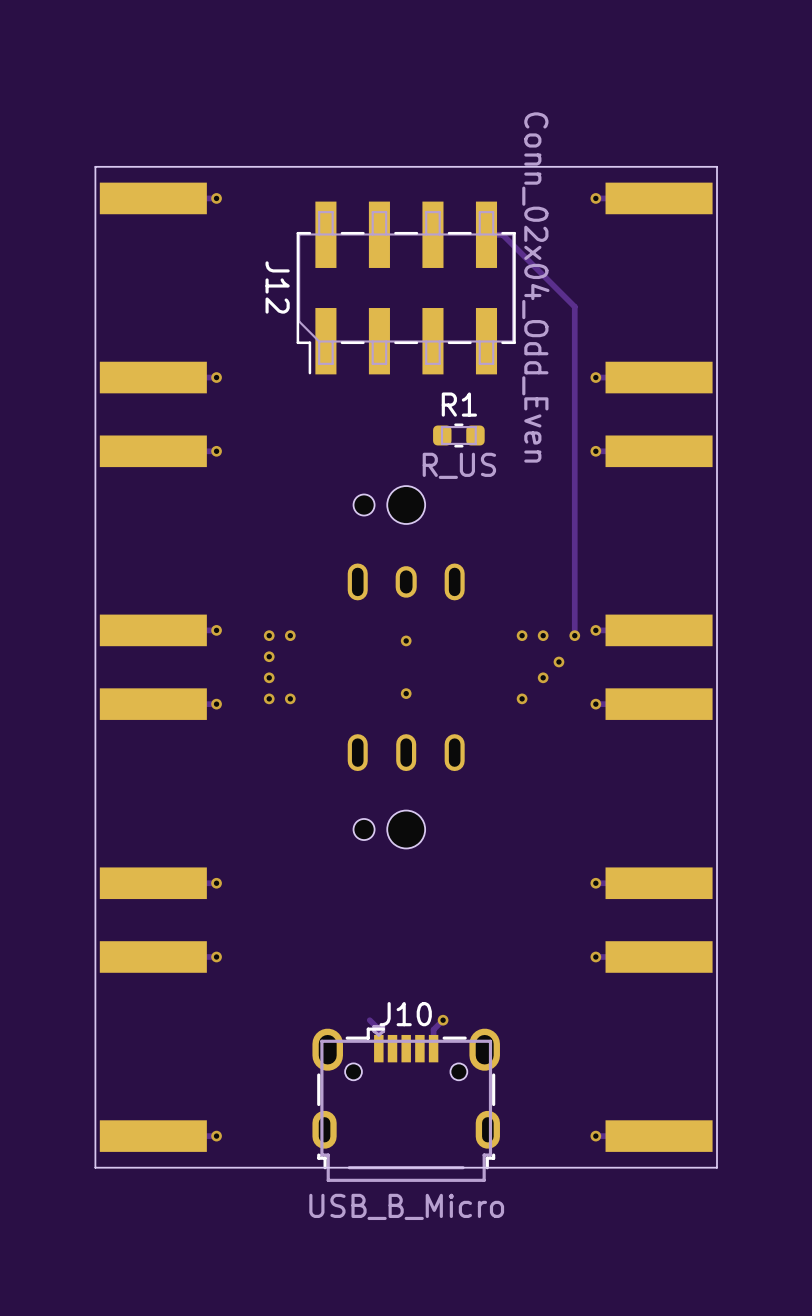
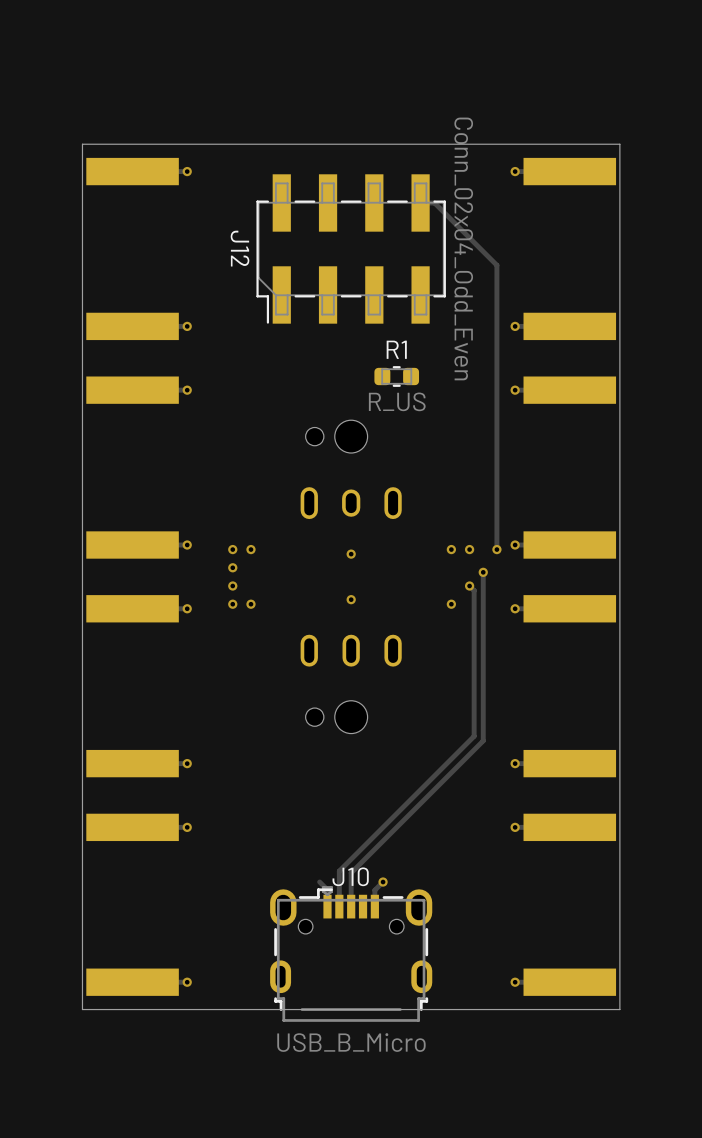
track: none -> (483, 572) (483, 740) (351, 872) (351, 906)
track: none -> (474, 590) (474, 736) (339, 871) (339, 906)

